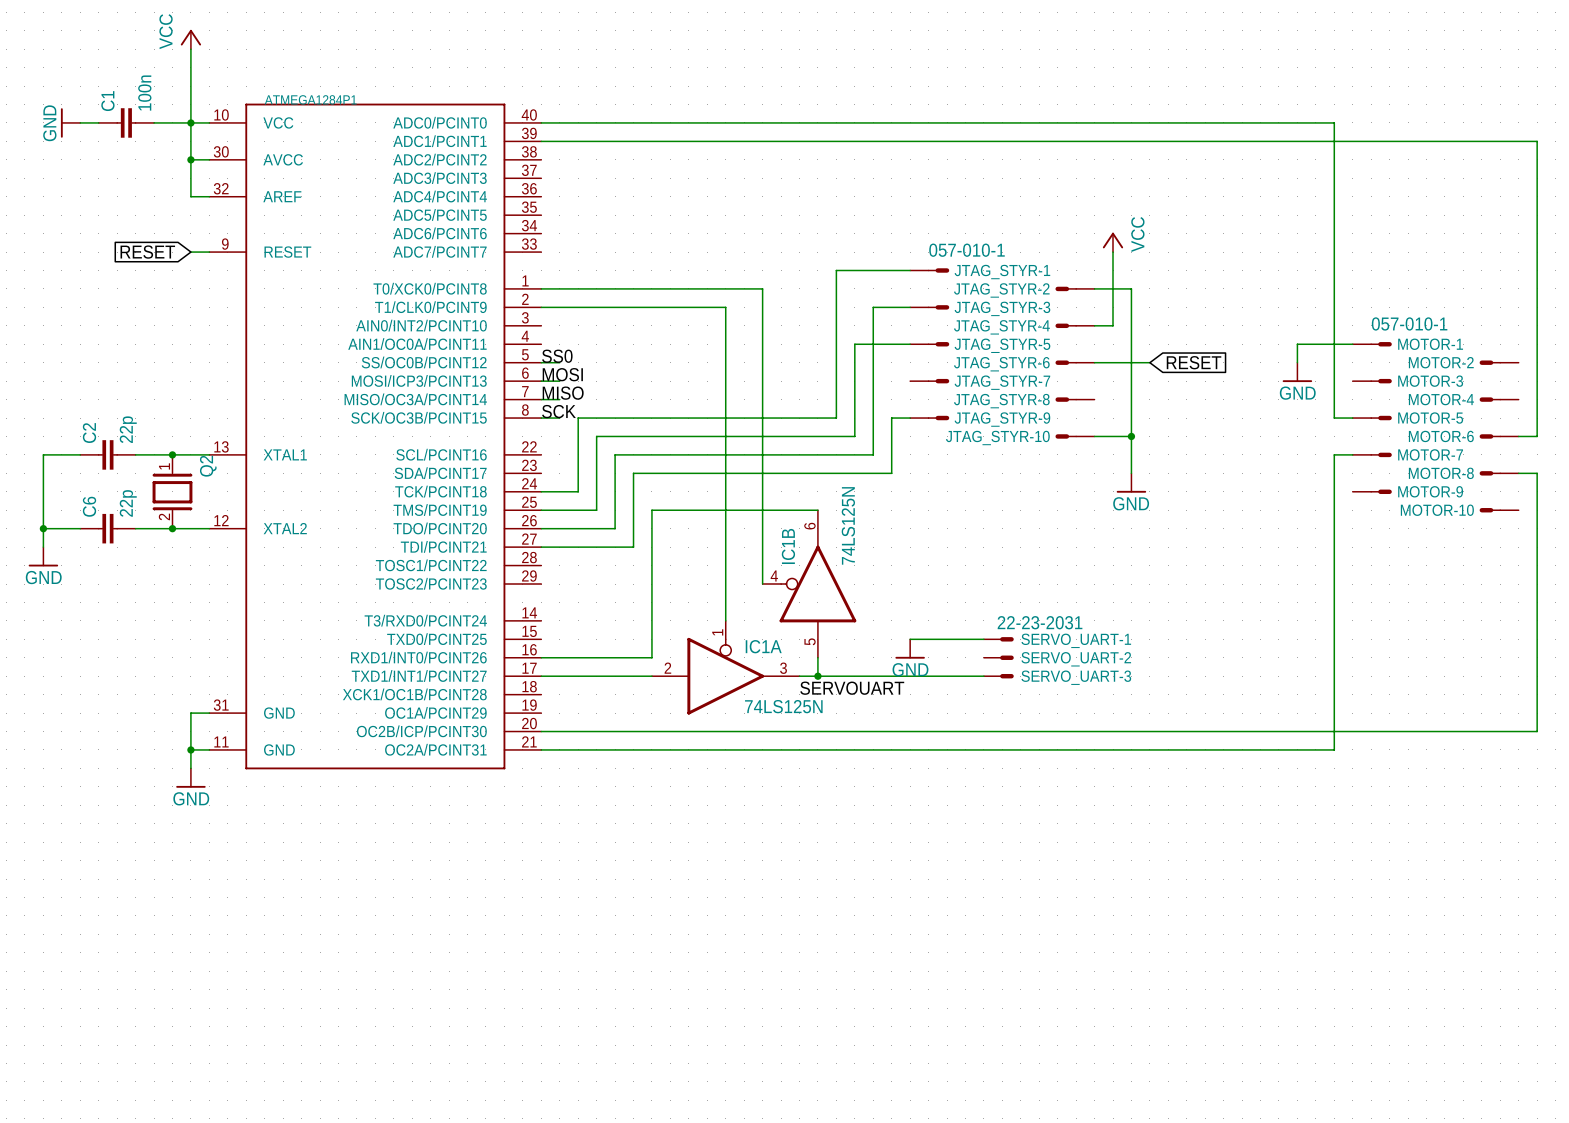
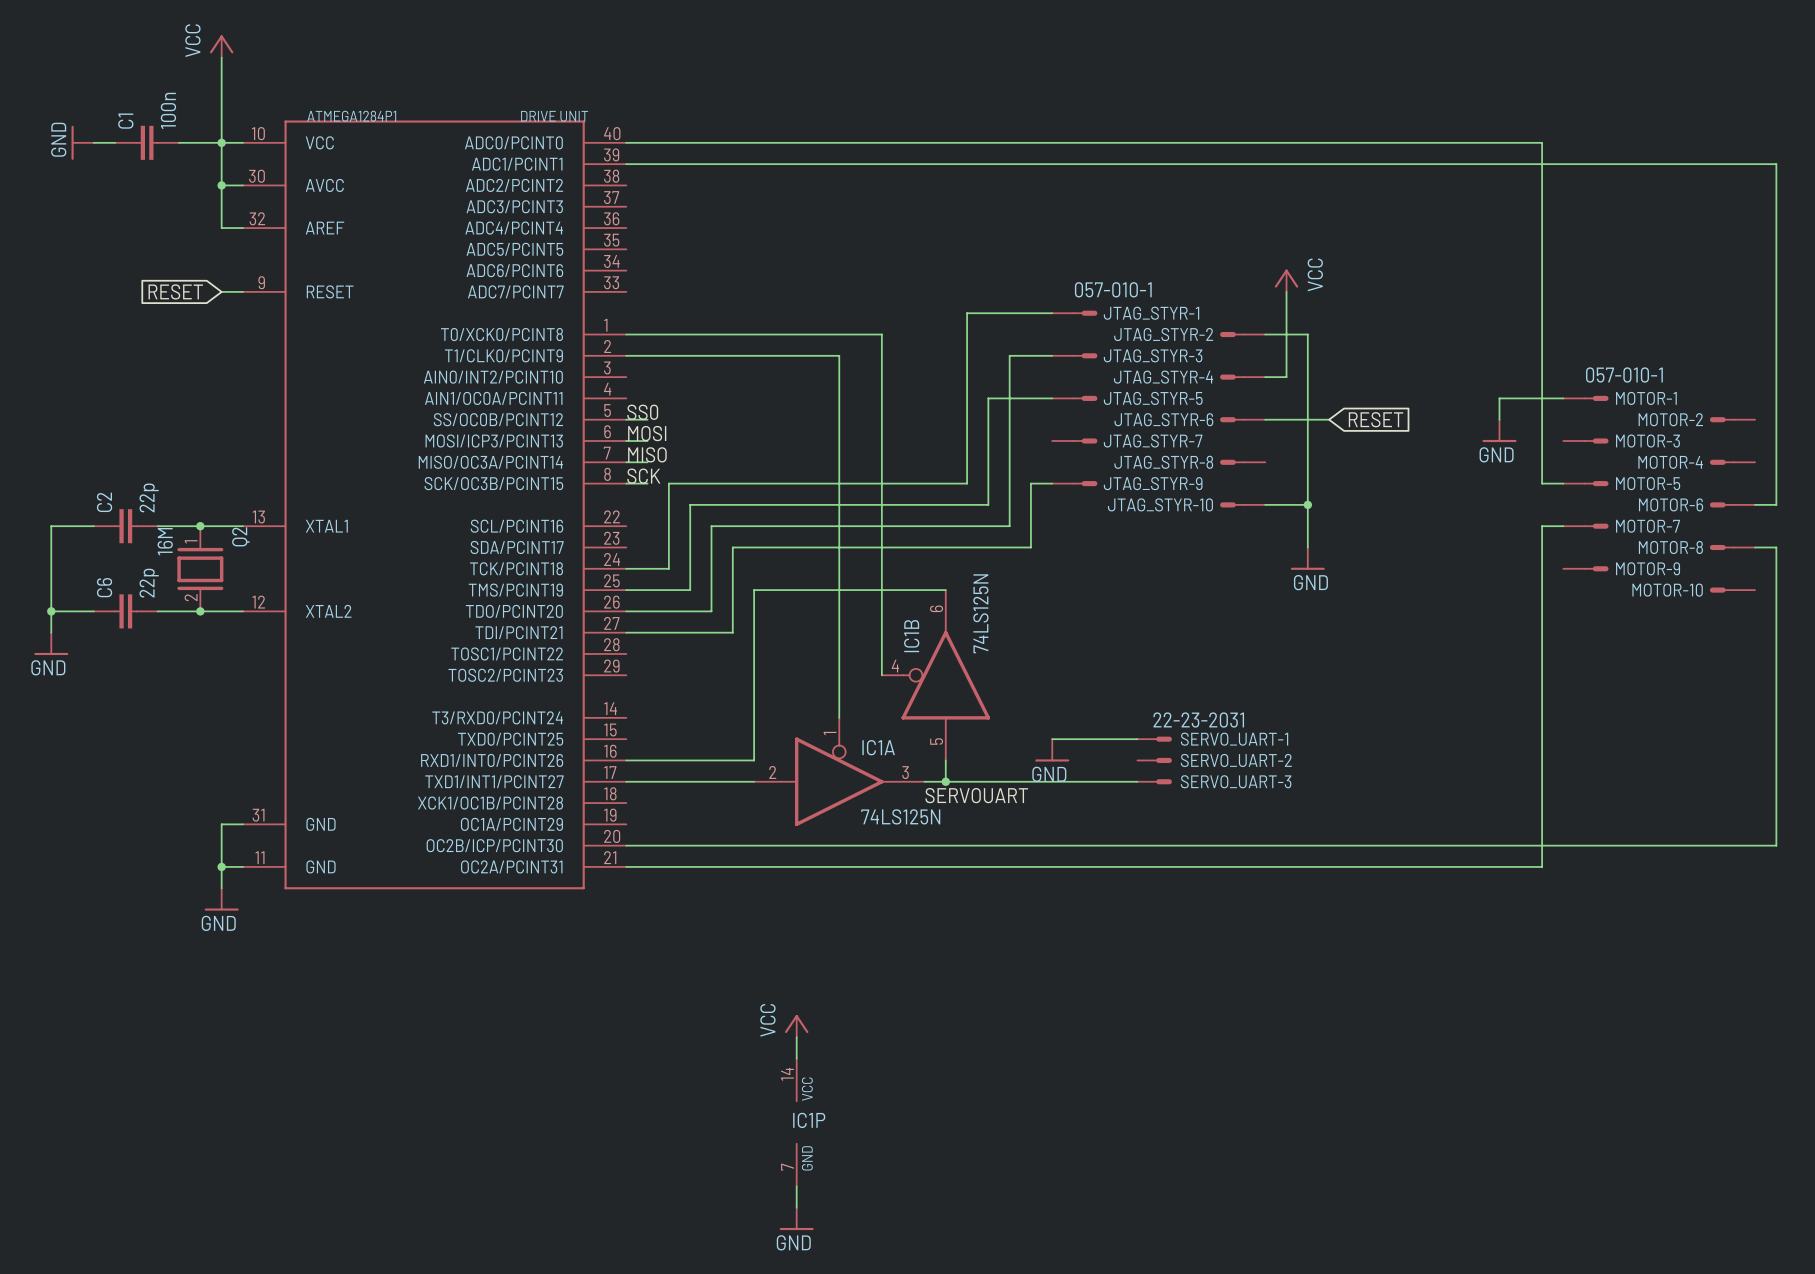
ATMEGA1284P1 value: none -> DRIVE UNIT (554, 116)
Q2 value: none -> 16M (165, 541)
power symbol: none -> VCC (796, 1026)
wire: none -> (796, 1037) (796, 1058)
IC1P: none -> (796, 1122)
wire: none -> (796, 1186) (796, 1207)
power symbol: none -> GND (796, 1218)

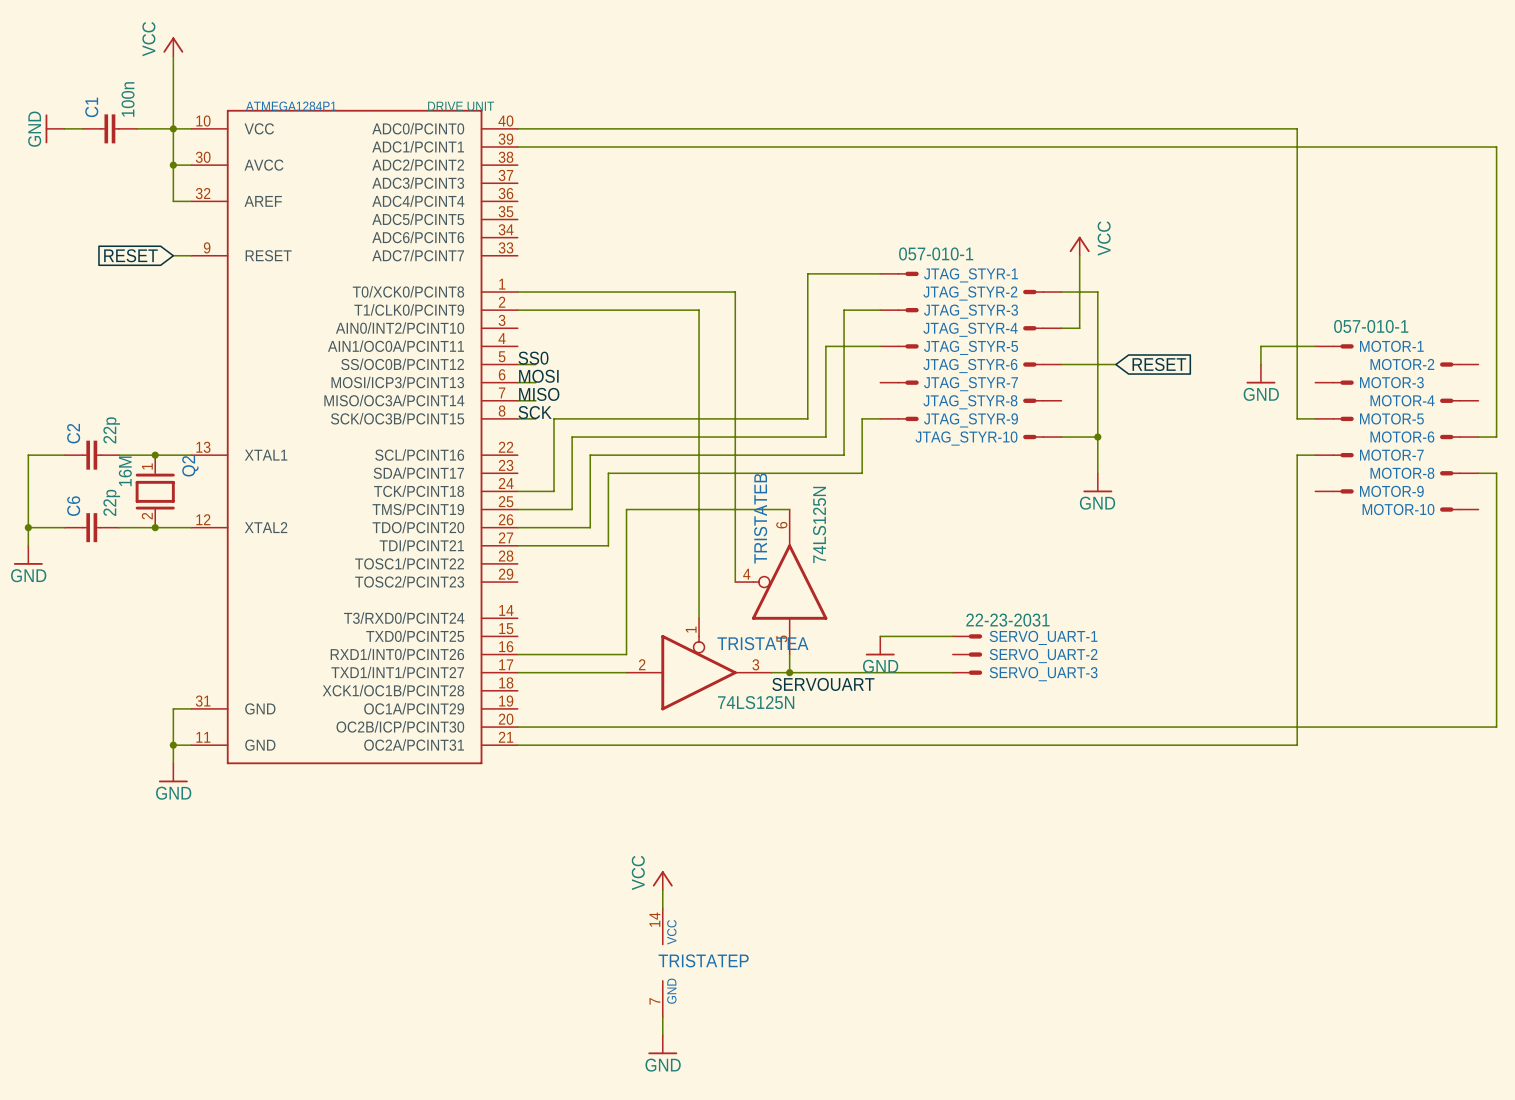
IC1B name: IC1B (911, 636) -> TRISTATEB (760, 518)
IC1A name: IC1A (878, 747) -> TRISTATEA (762, 643)
IC1P name: IC1P (809, 1120) -> TRISTATEP (703, 960)

